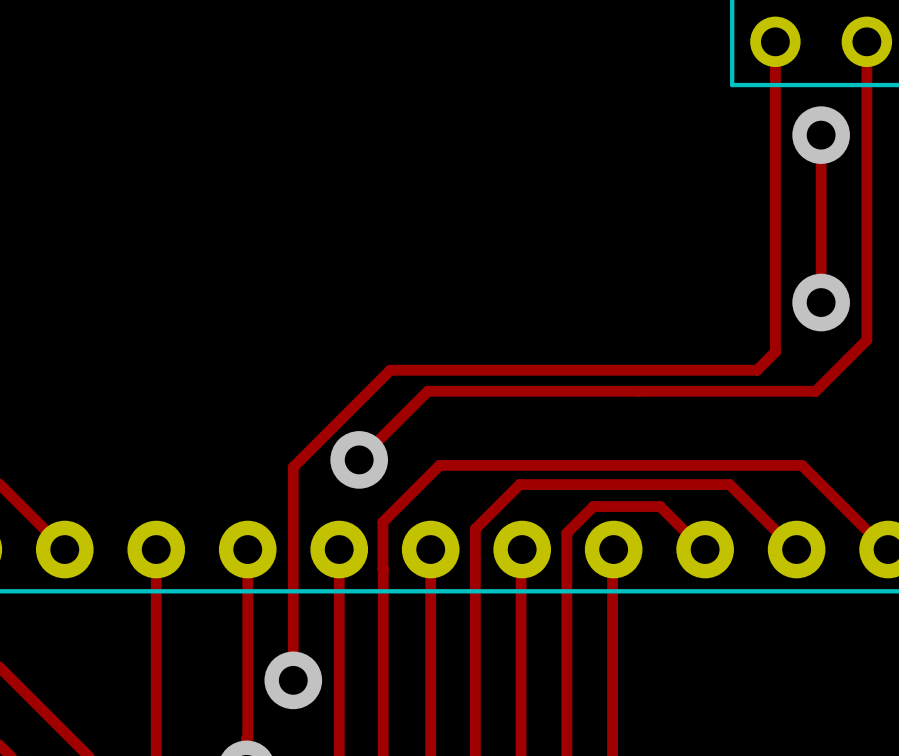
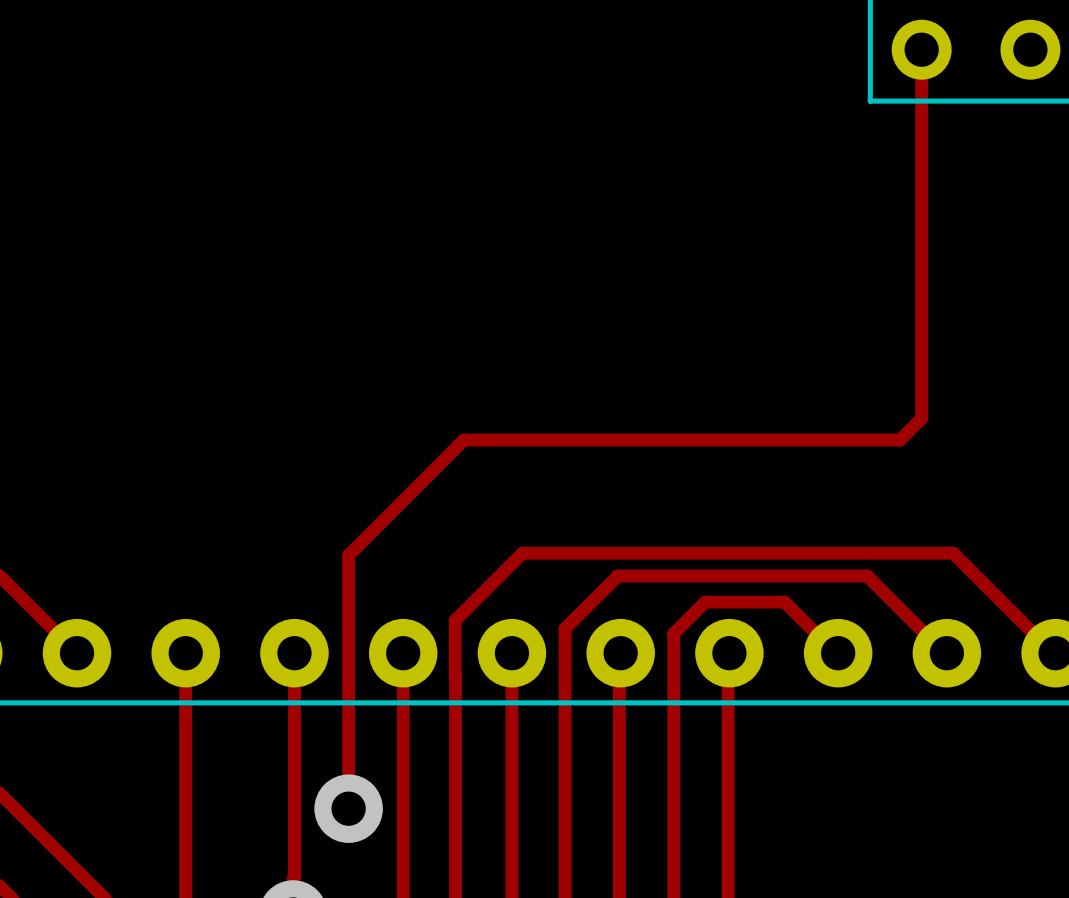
track: (866, 41) (866, 340) (815, 391) (427, 391) (359, 459) -> none
track: (821, 135) (821, 302) -> none
via: (821, 135) -> none
via: (821, 302) -> none
via: (359, 459) -> none

